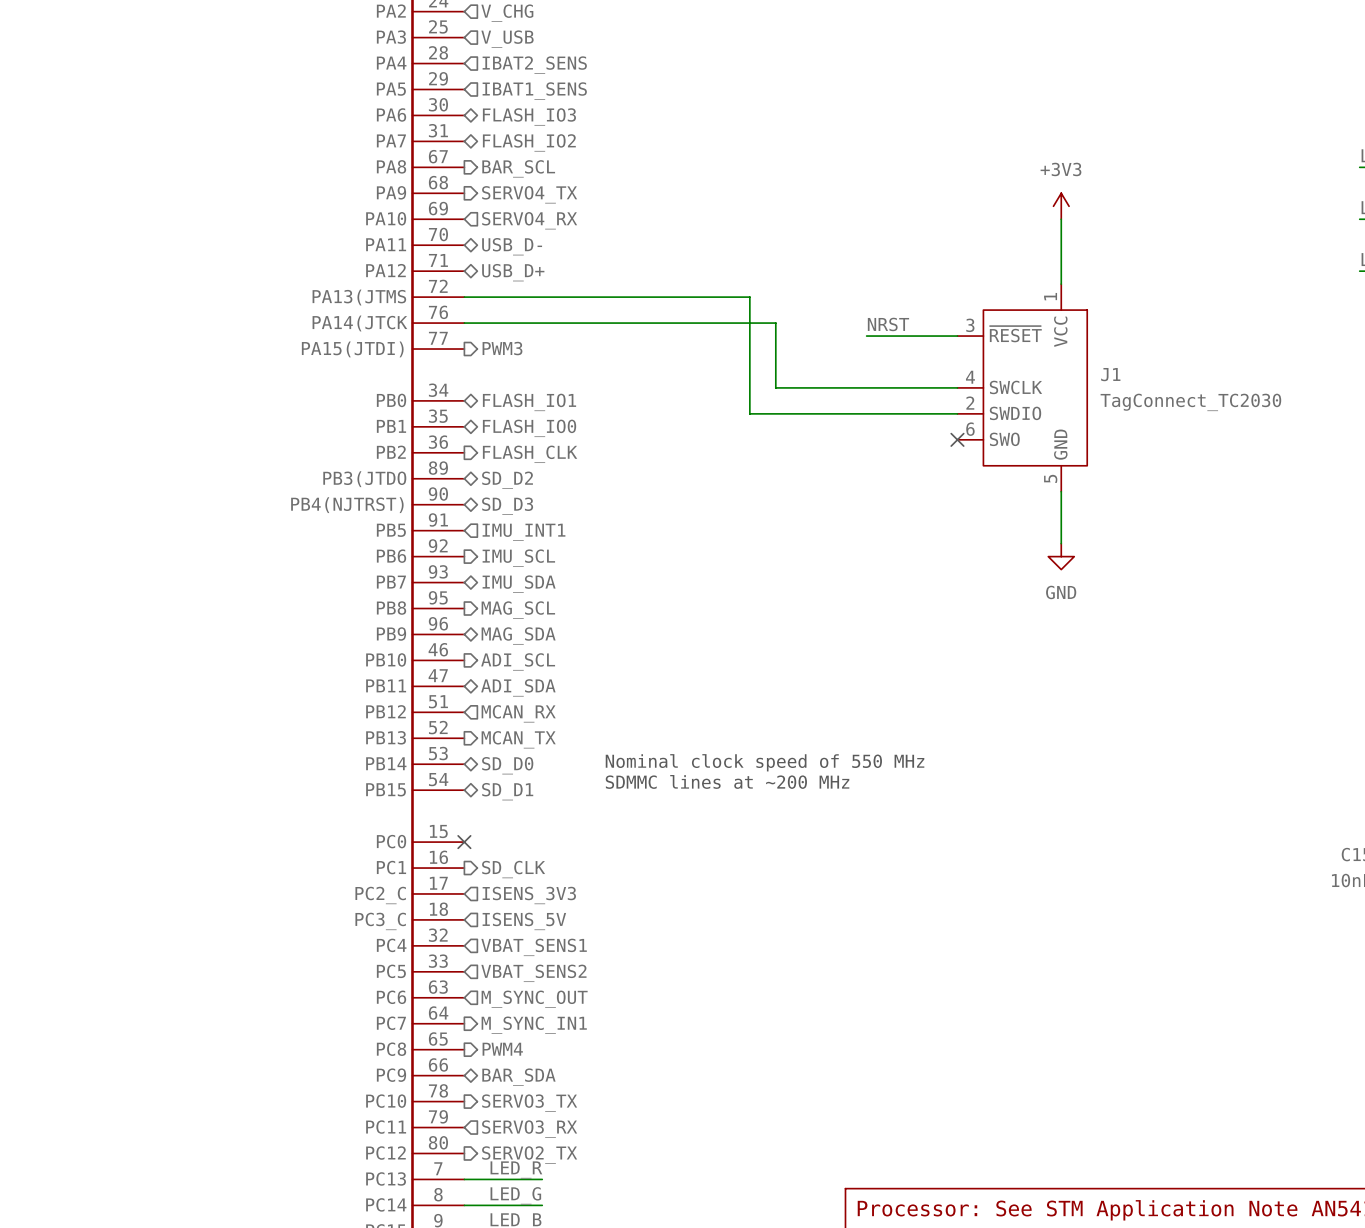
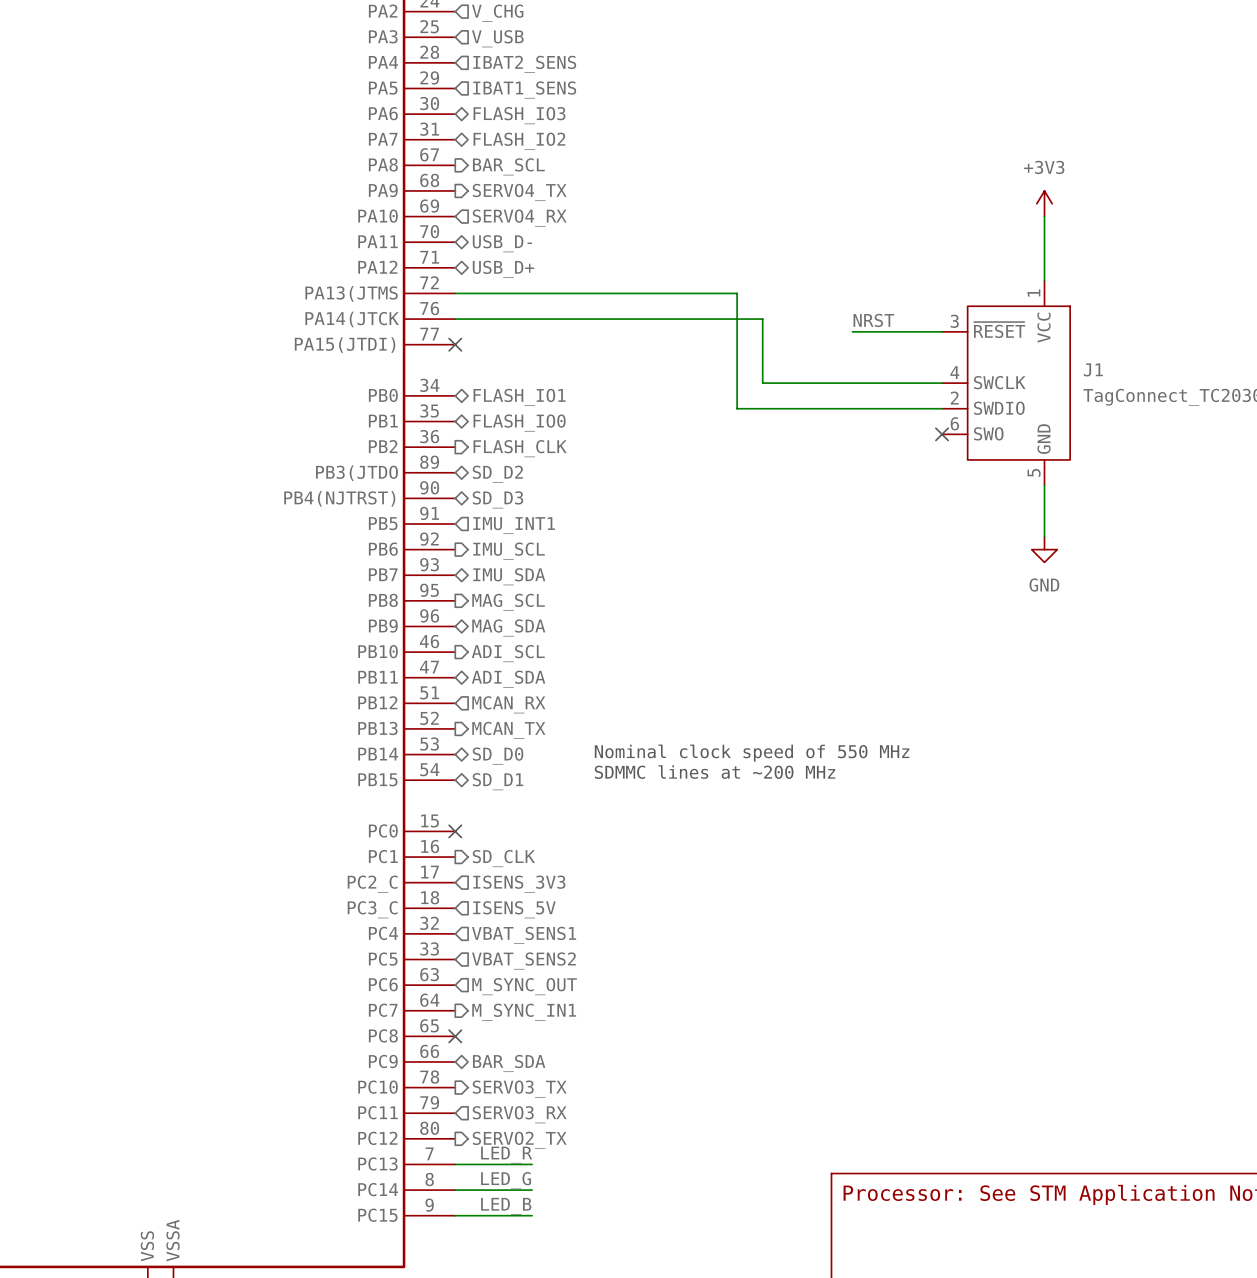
hierarchical label: PWM3 (502, 348) -> none
no-connect mark: none -> (455, 344)
no-connect mark: none -> (455, 1036)
hierarchical label: PWM4 (502, 1049) -> none

